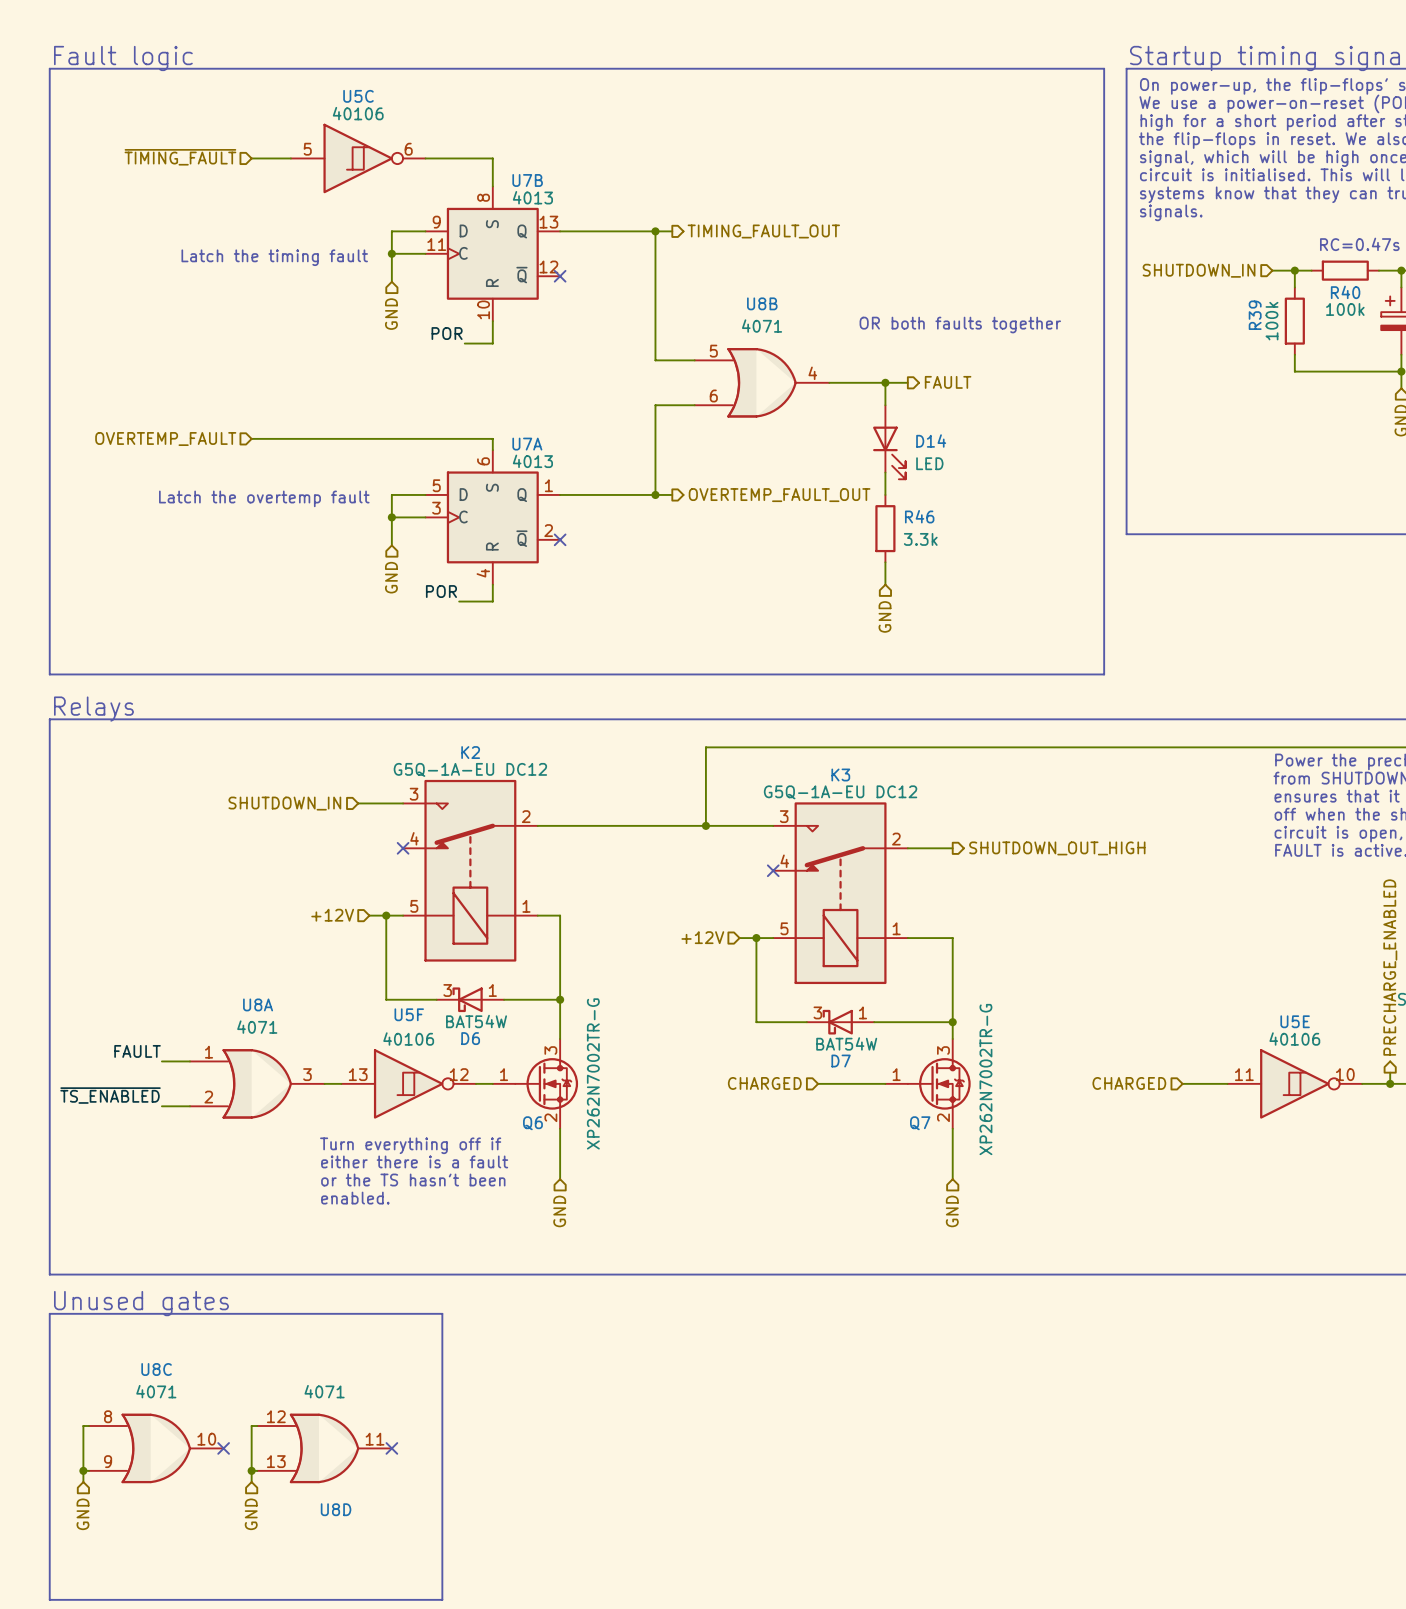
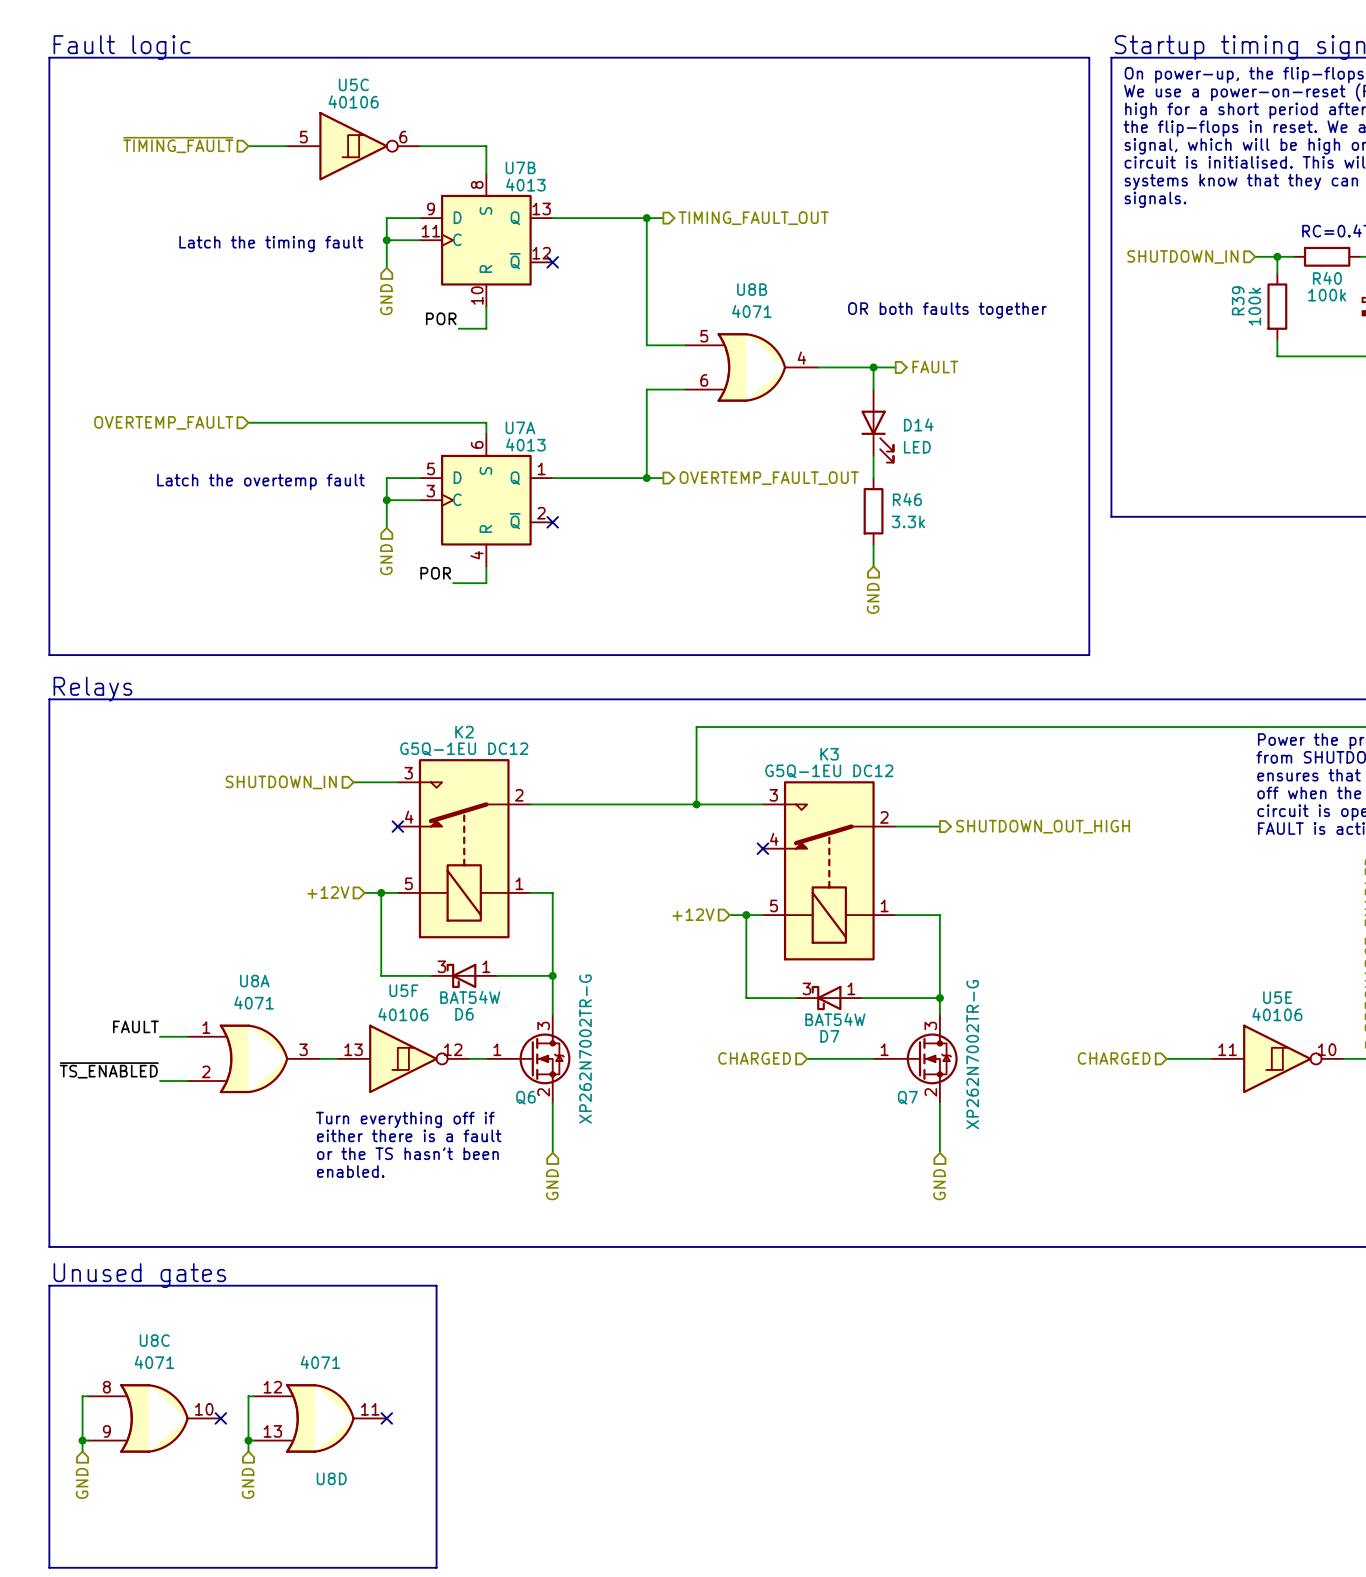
K2 value: G5Q-1A-EU DC12 (470, 769) -> G5Q-1EU DC12 (464, 749)
K3 value: G5Q-1A-EU DC12 (840, 792) -> G5Q-1EU DC12 (829, 771)

